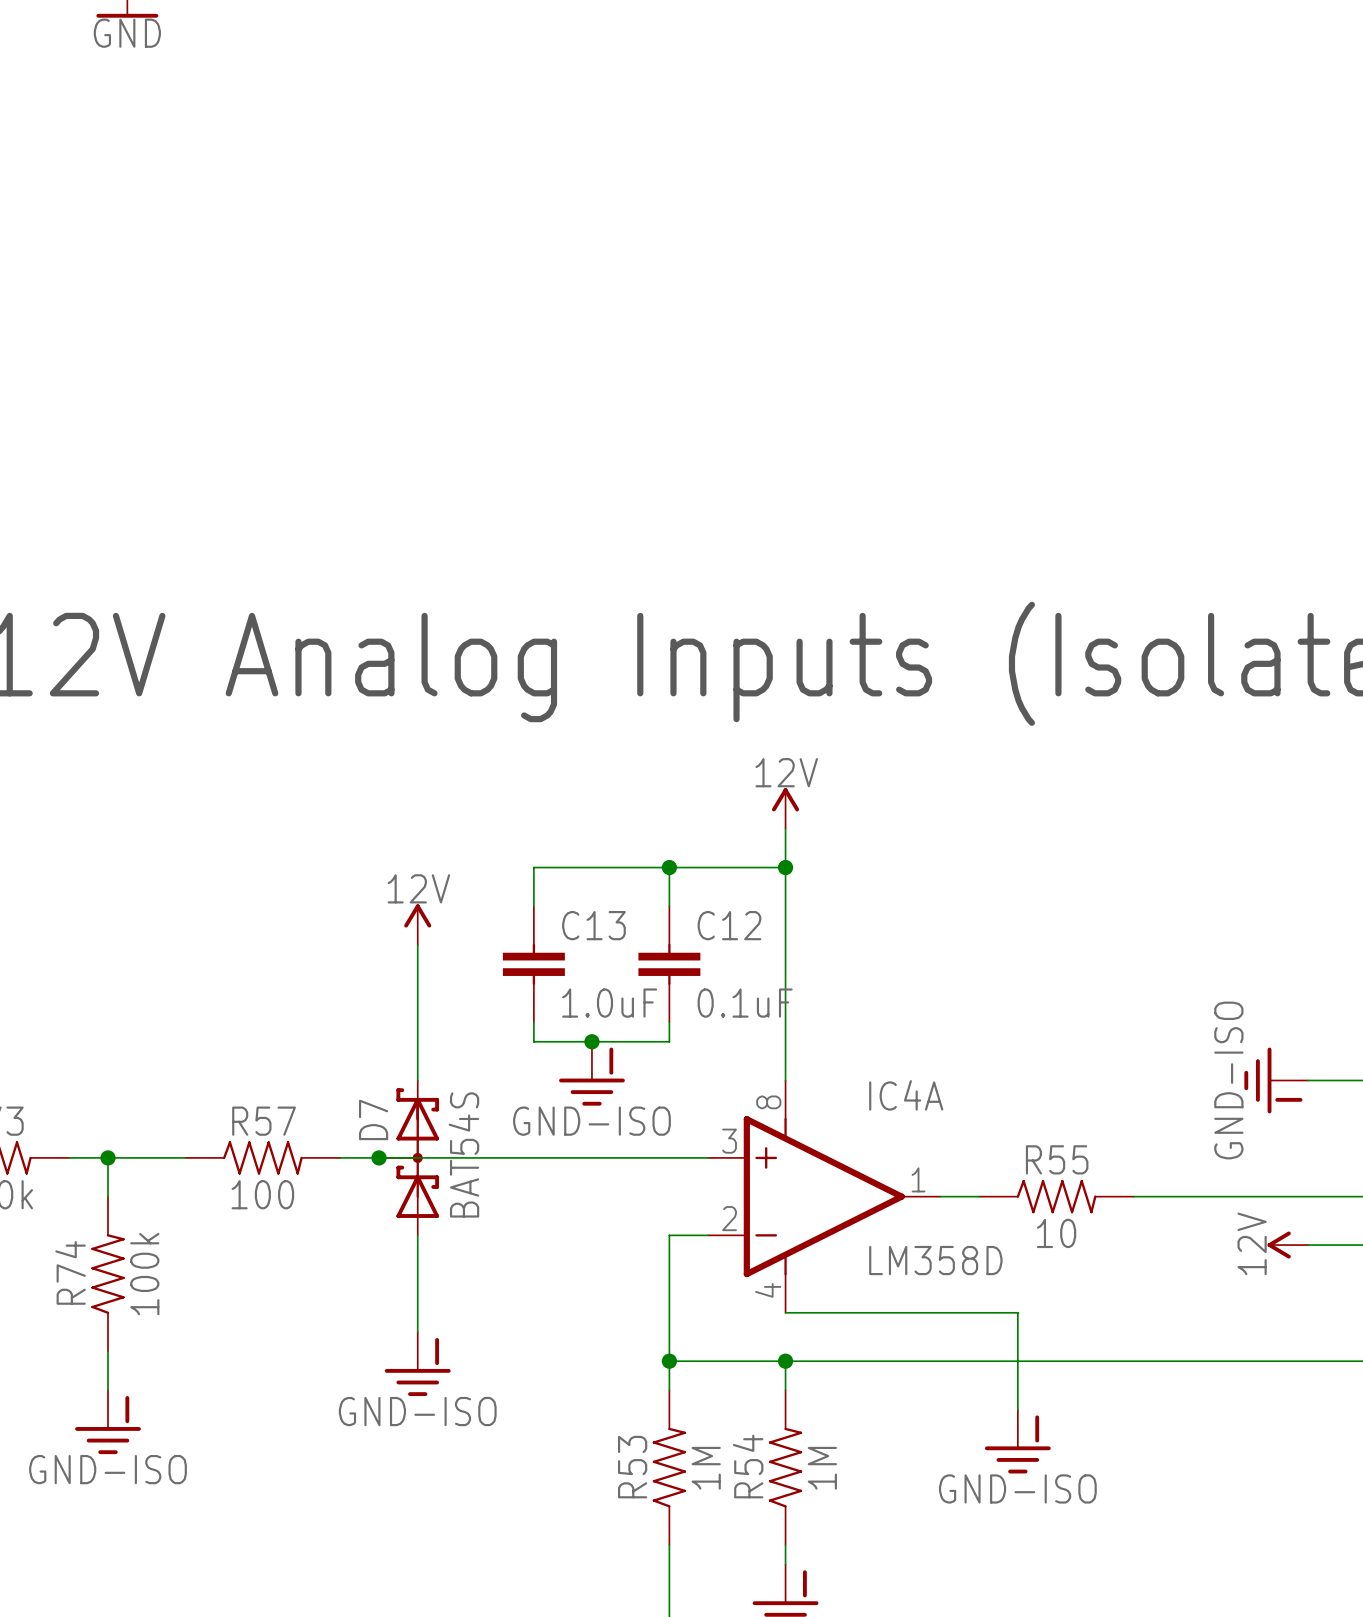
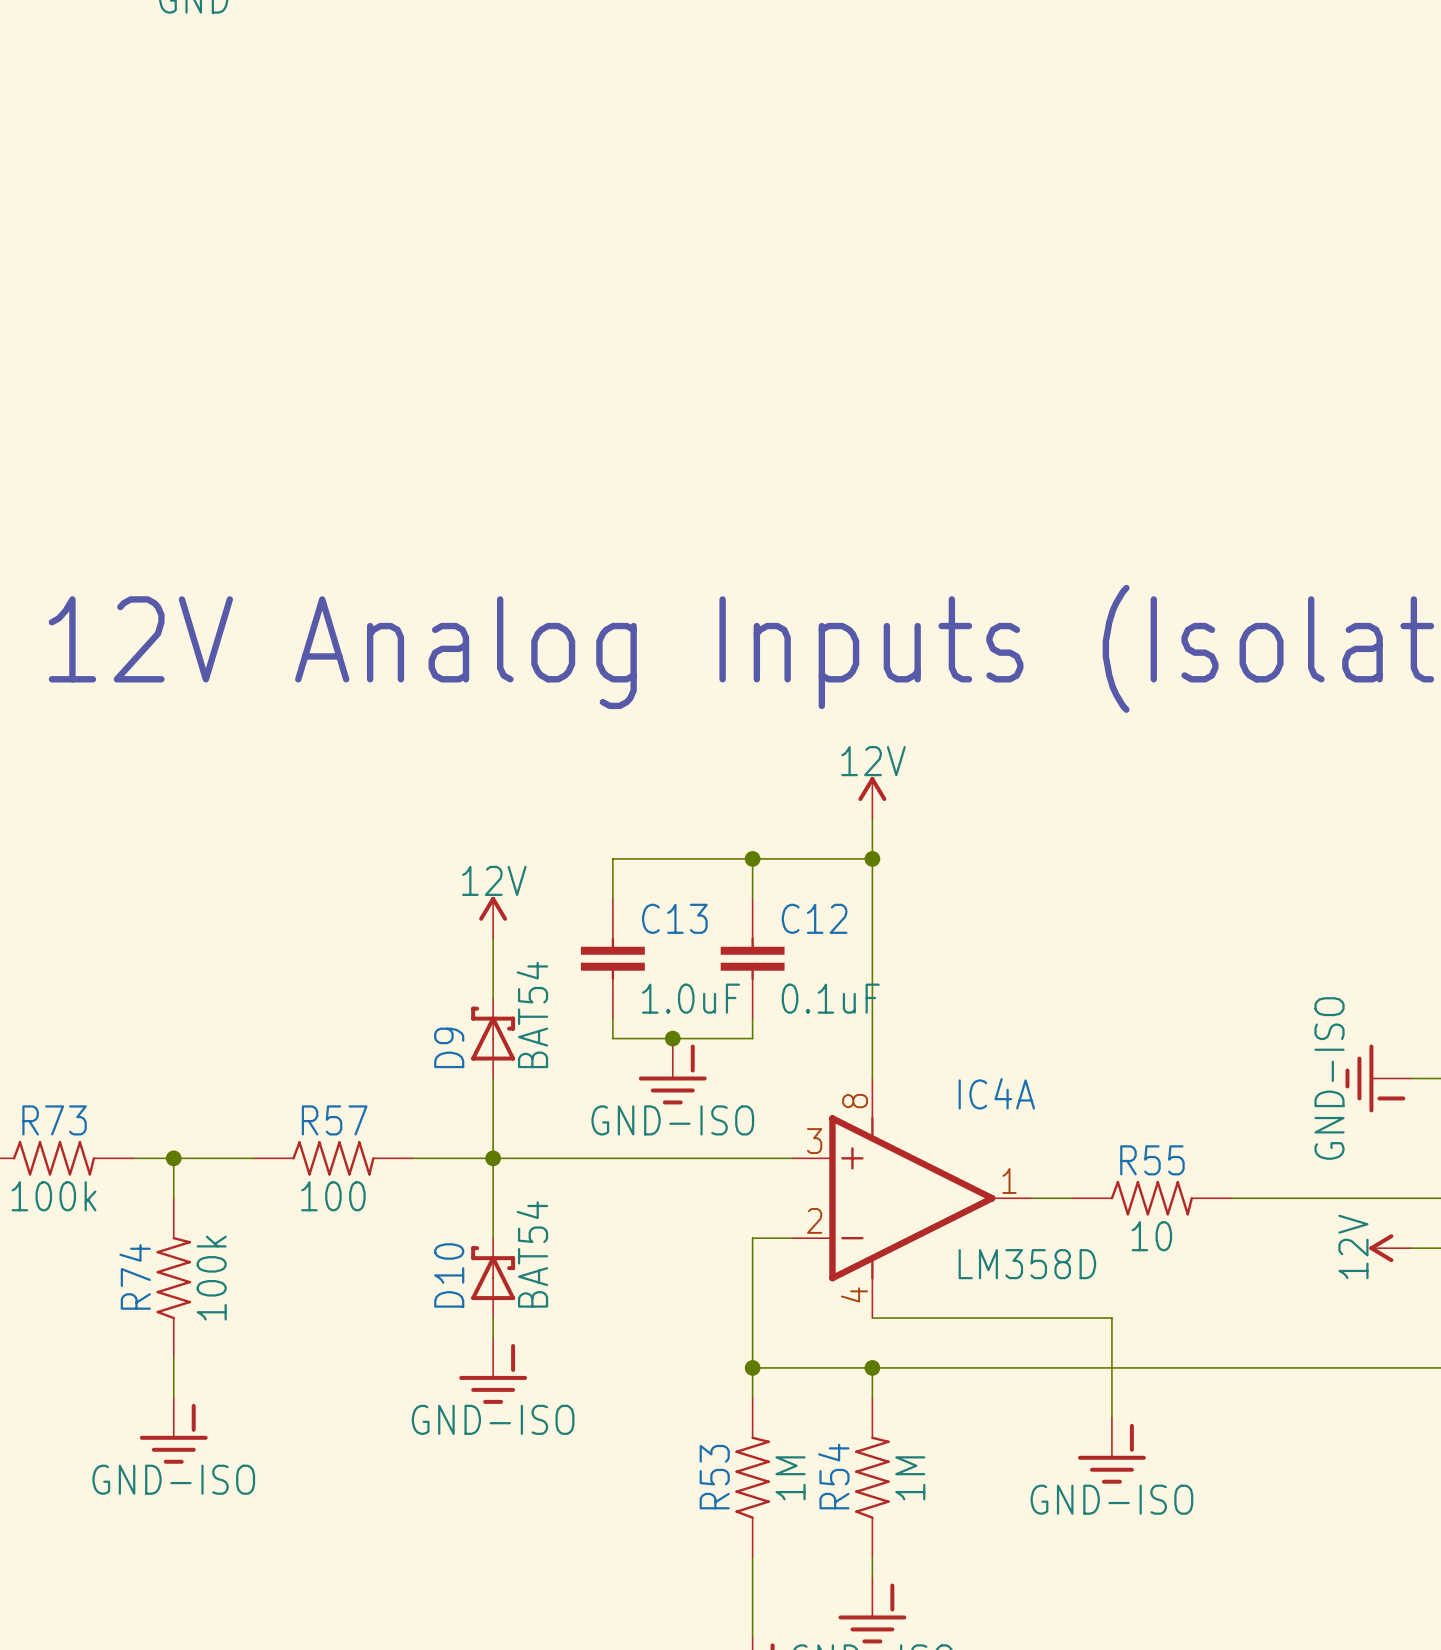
D9: none -> BAT54 (493, 1038)
junction position: (379, 1157) -> (493, 1158)
D7: BAT54S (409, 1157) -> none
D10: none -> BAT54 (493, 1278)

